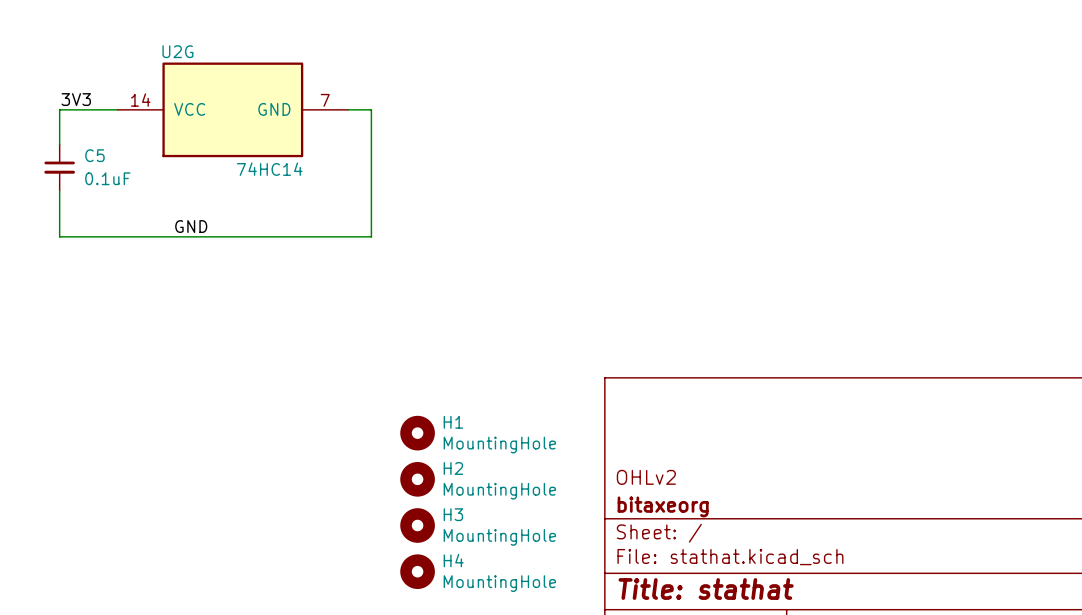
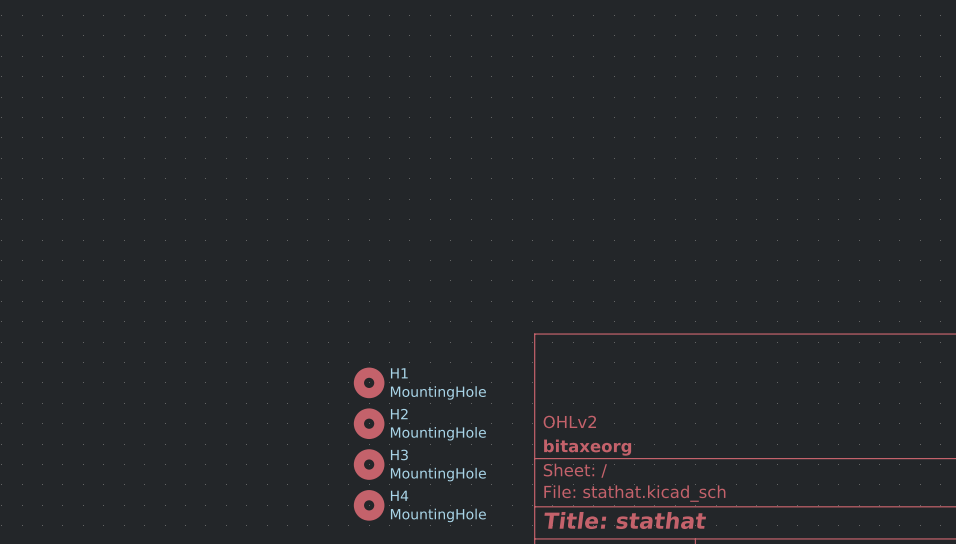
label: 3V3 (76, 99) -> none
wire: (117, 109) (59, 109) (59, 144) -> none
U2G: 74HC14 (232, 109) -> none
wire: (348, 109) (371, 109) (371, 236) (59, 236) (59, 190) -> none
C5: 0.1uF (59, 167) -> none
label: GND (191, 226) -> none

